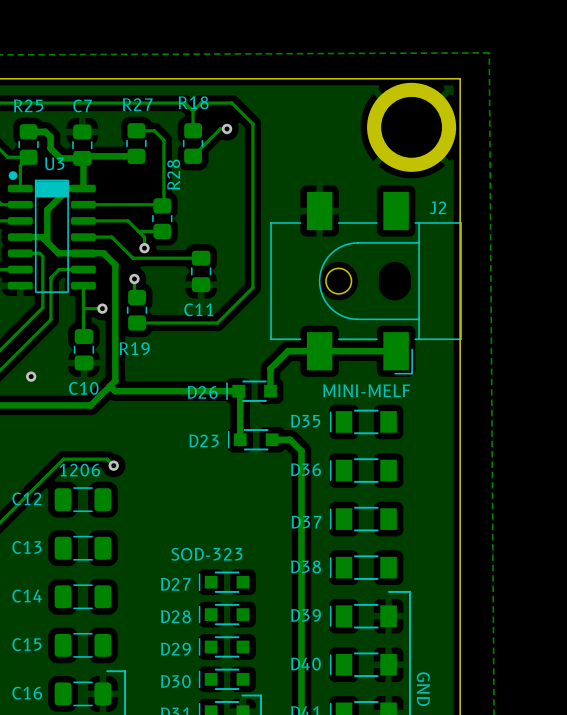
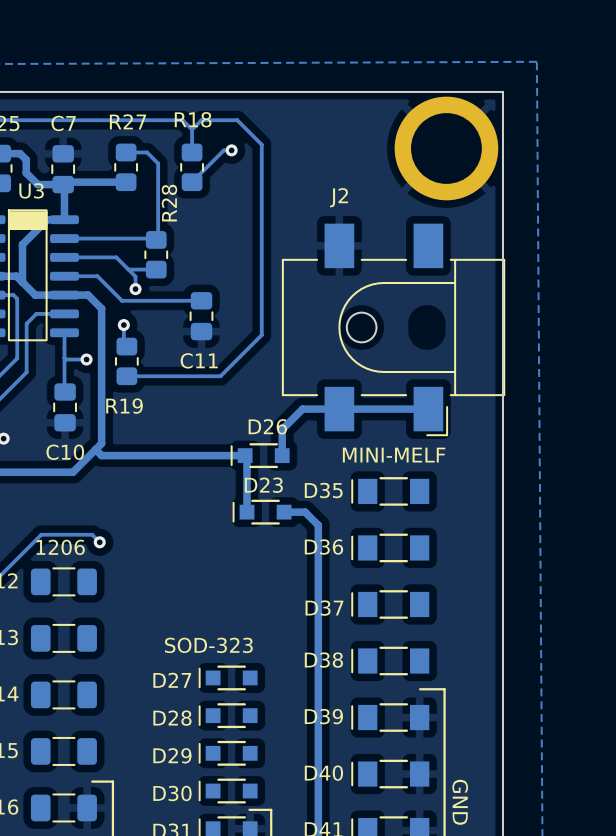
J2 name position: J2 (438, 207) -> J2 (339, 197)
D26 name position: D26 (202, 392) -> D26 (267, 426)
D23 name position: D23 (204, 440) -> D23 (263, 485)

